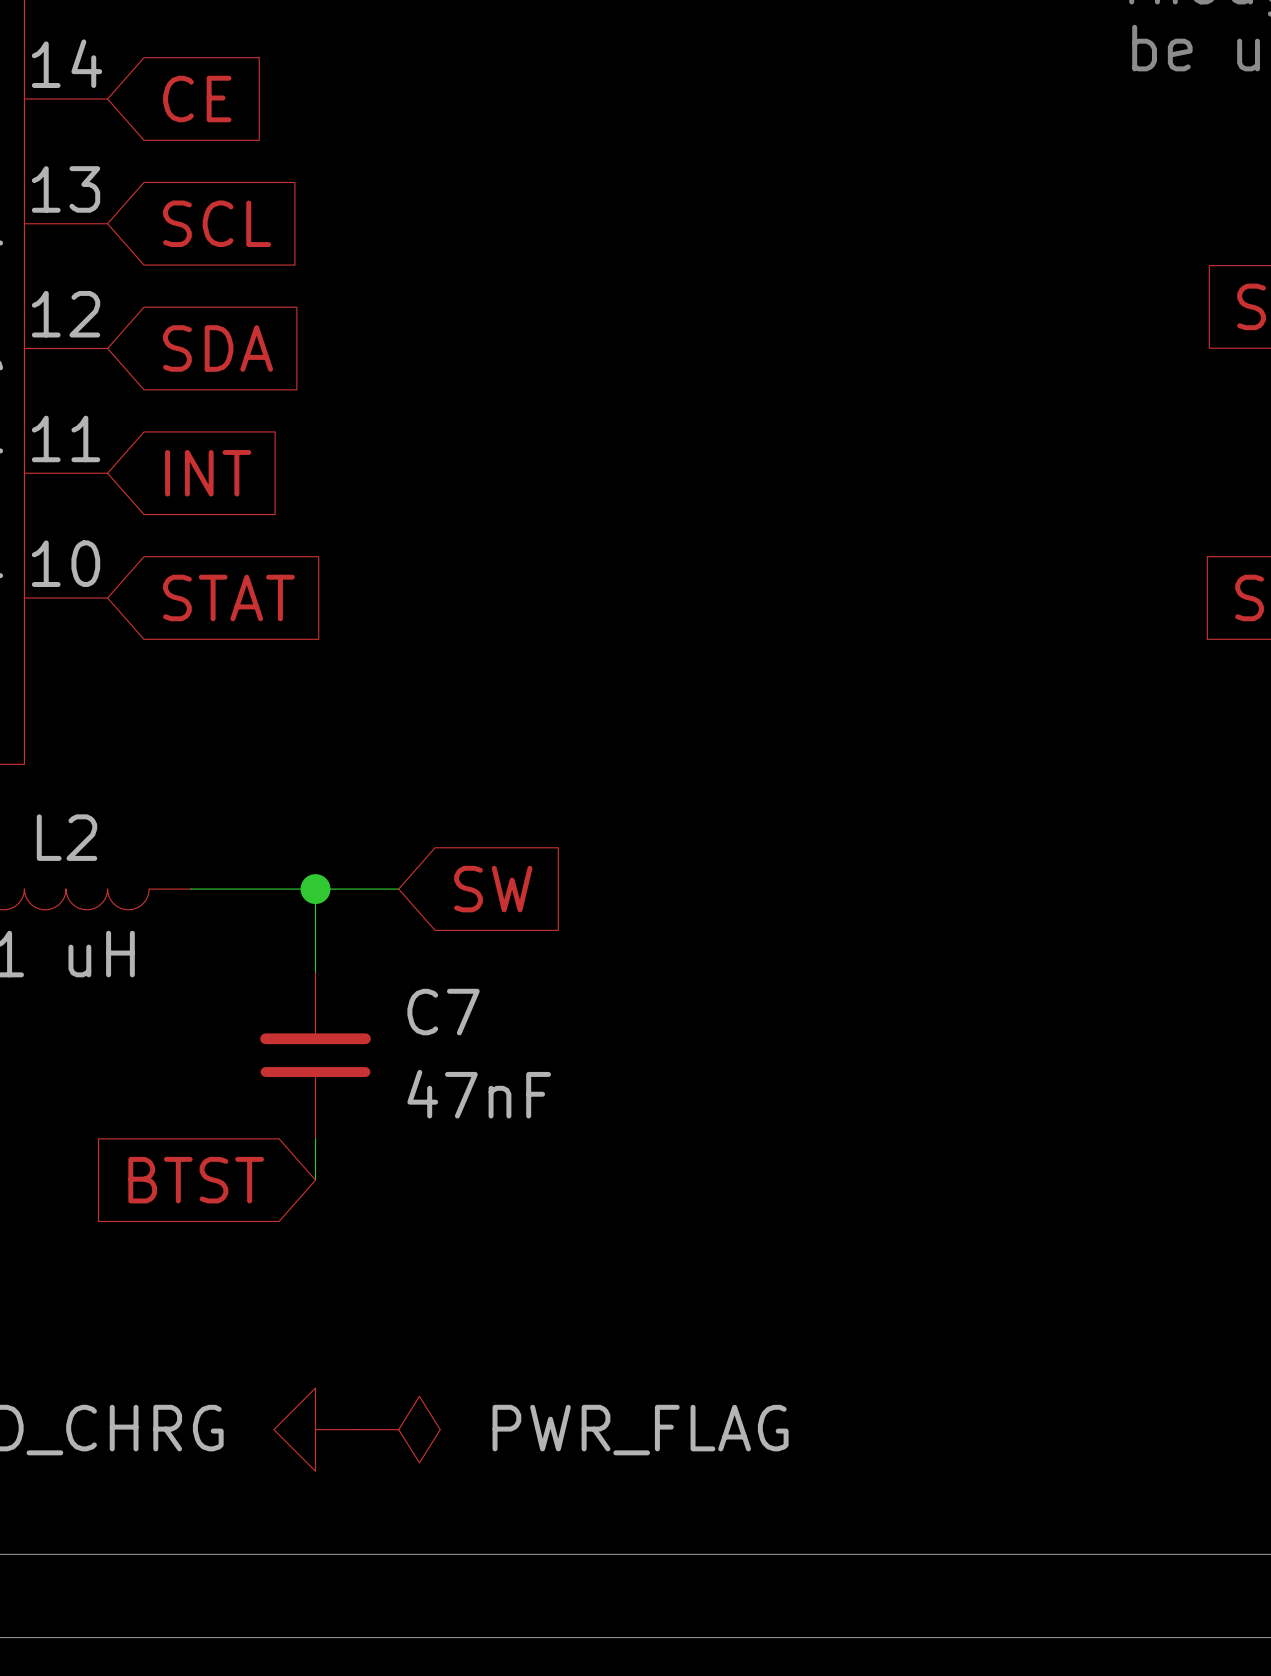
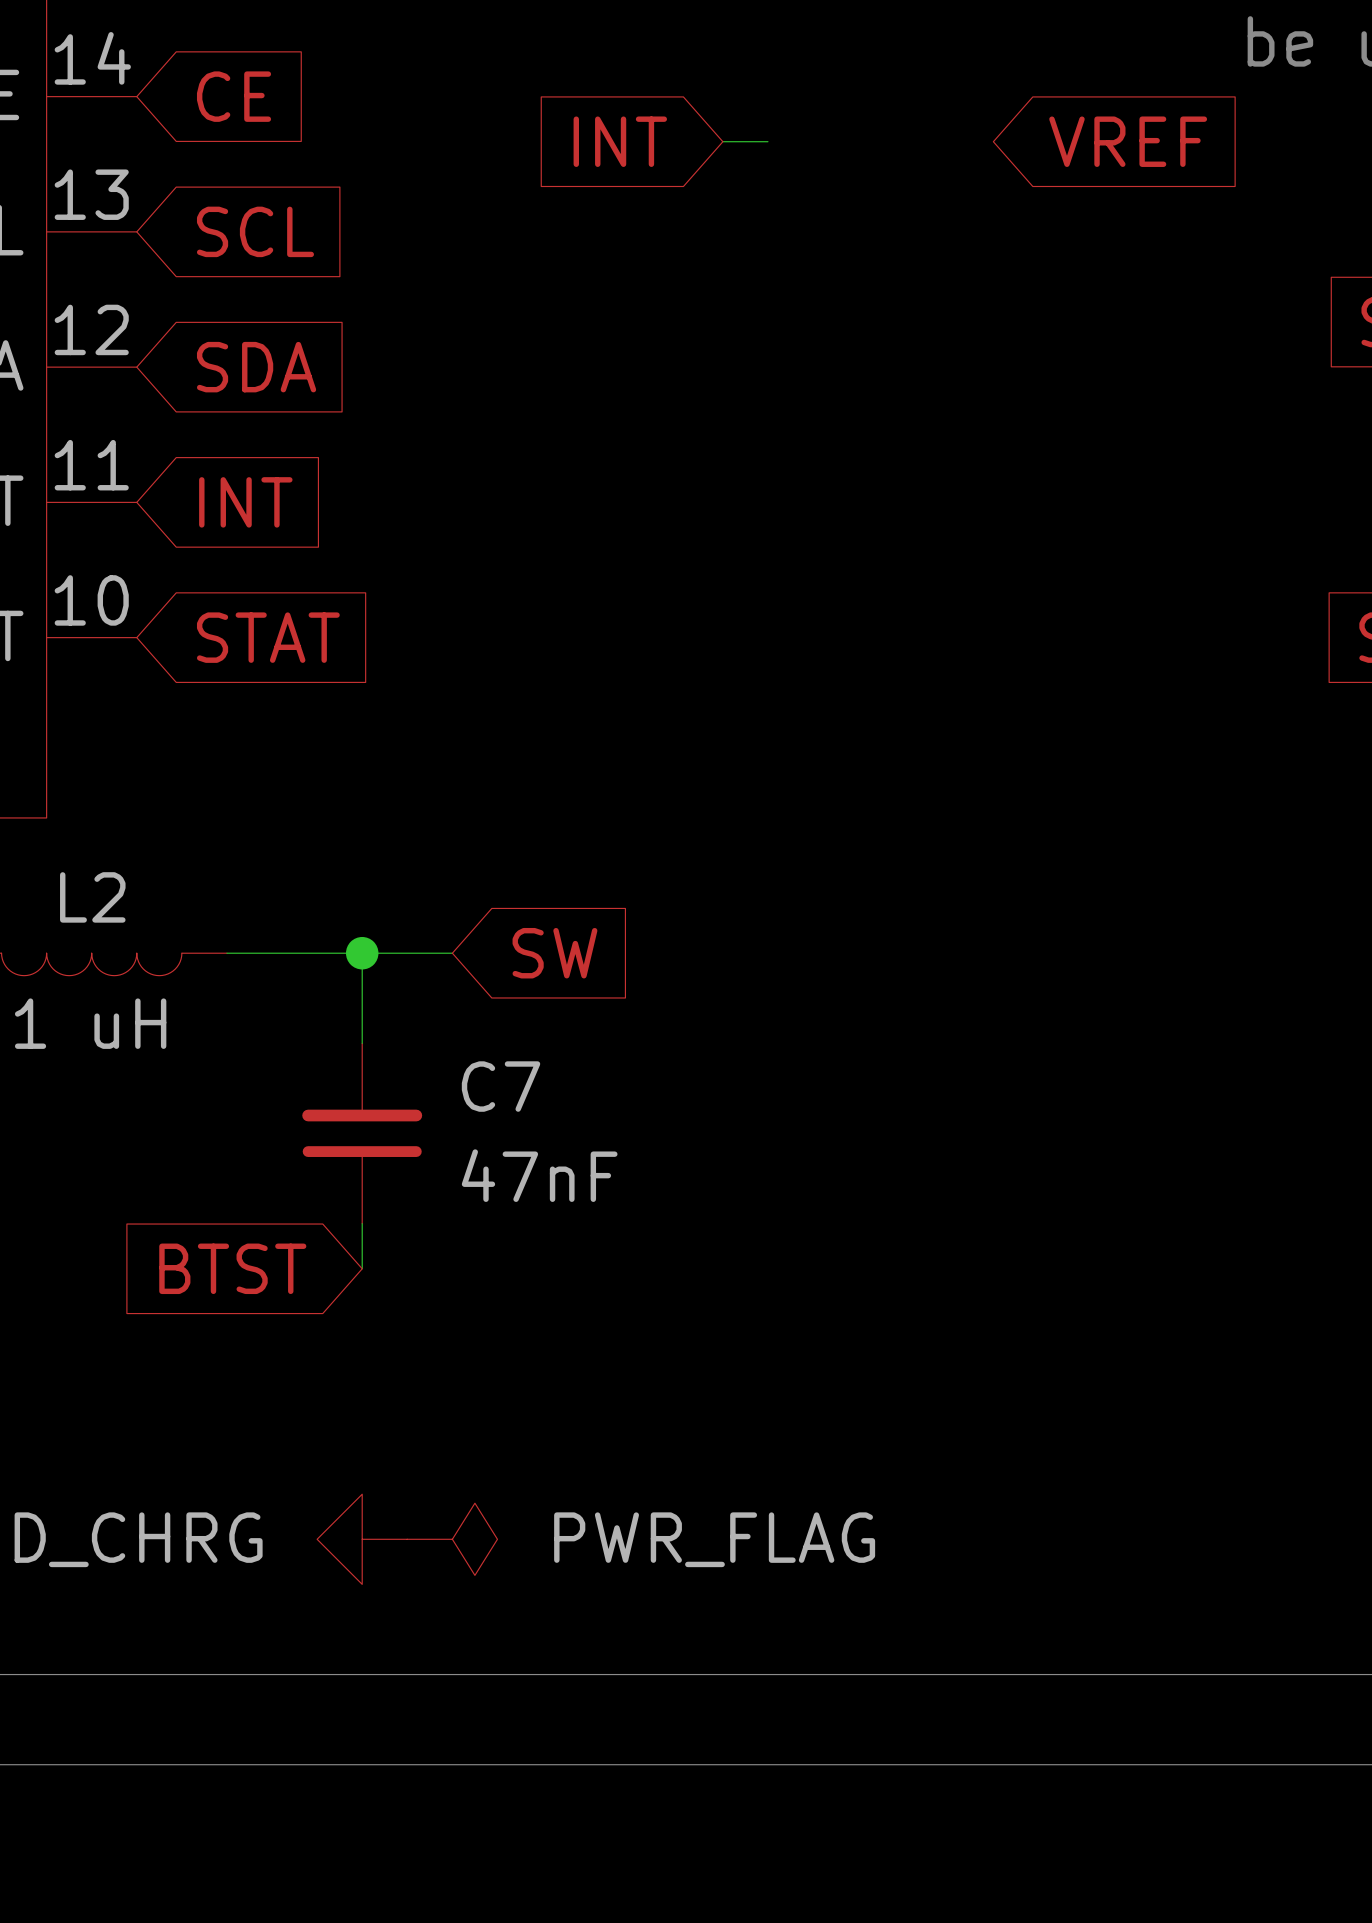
global label: none -> INT (620, 141)
wire: none -> (722, 141) (767, 141)
global label: none -> VREF (1128, 141)

